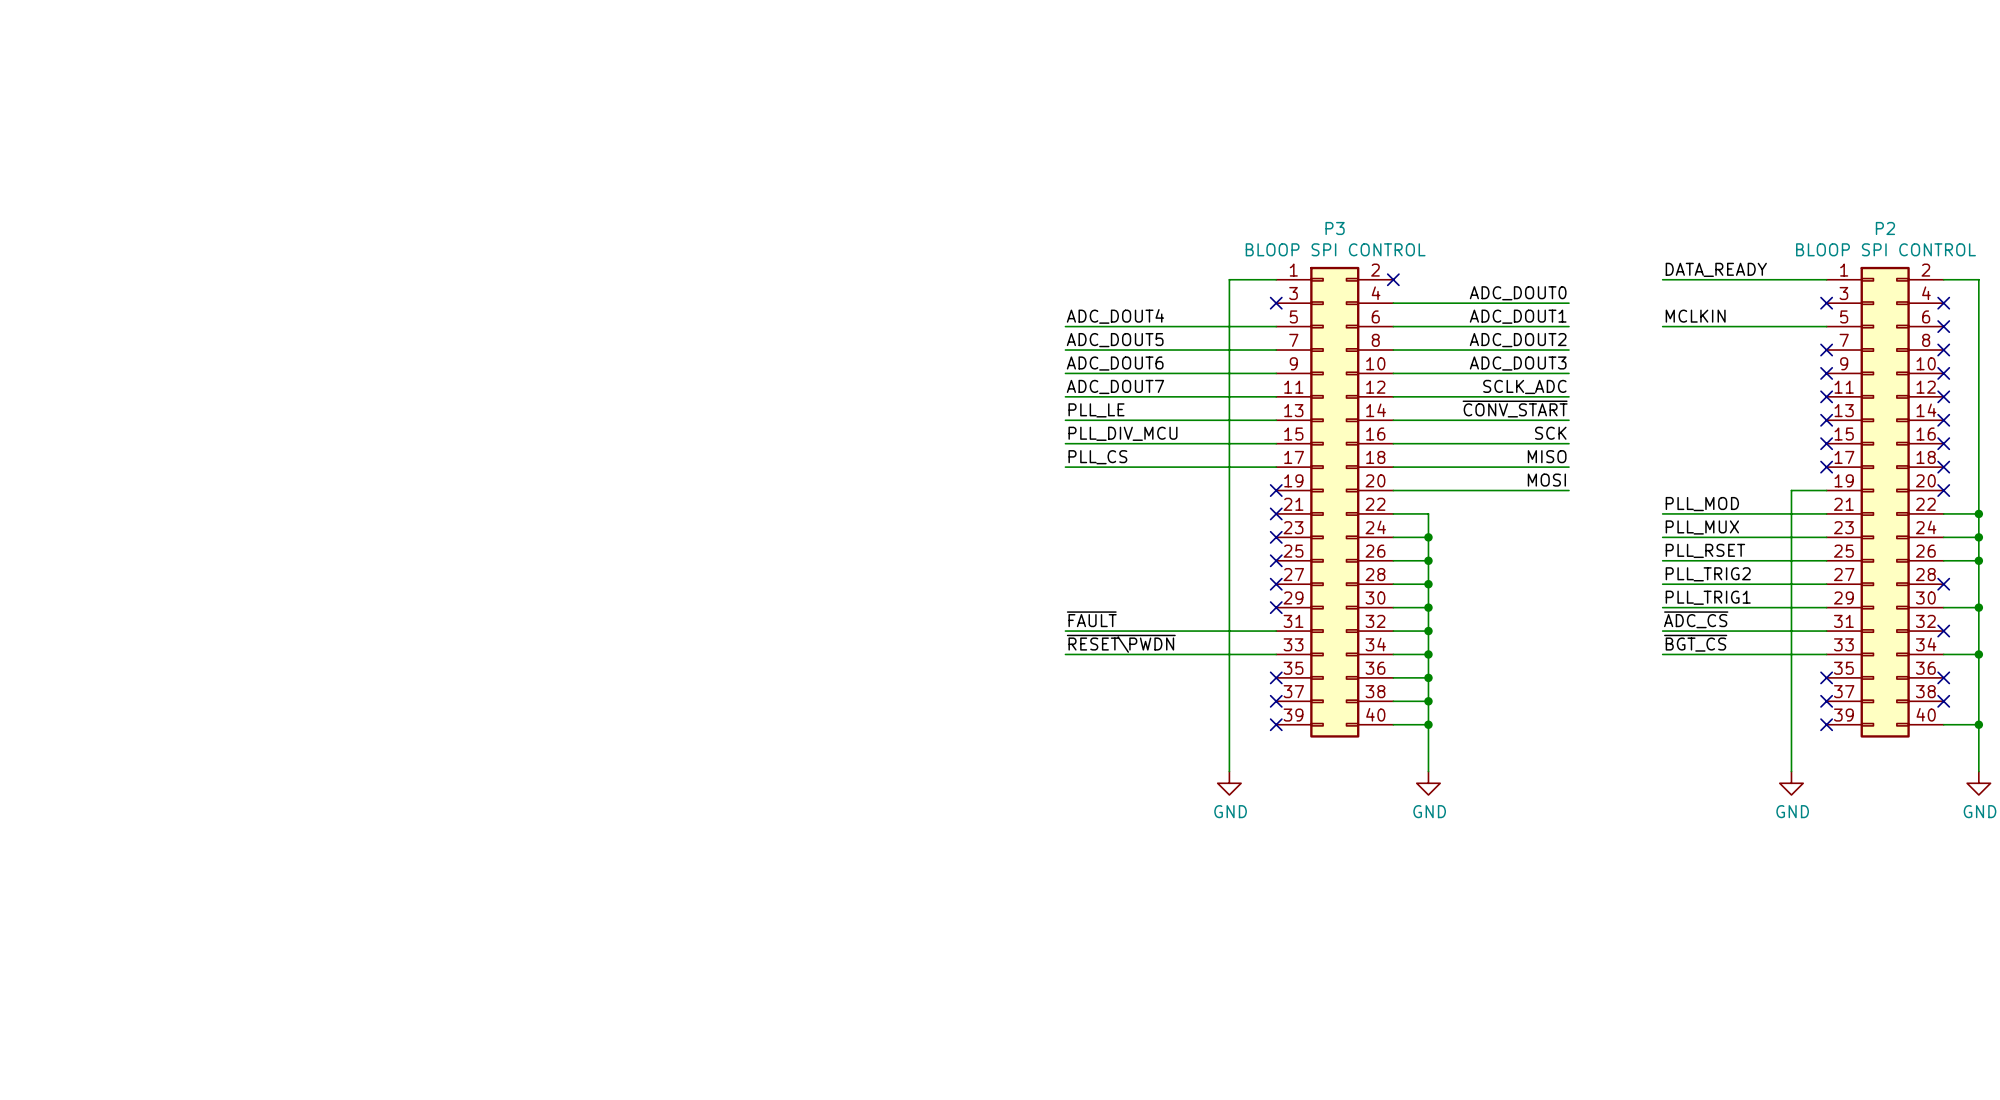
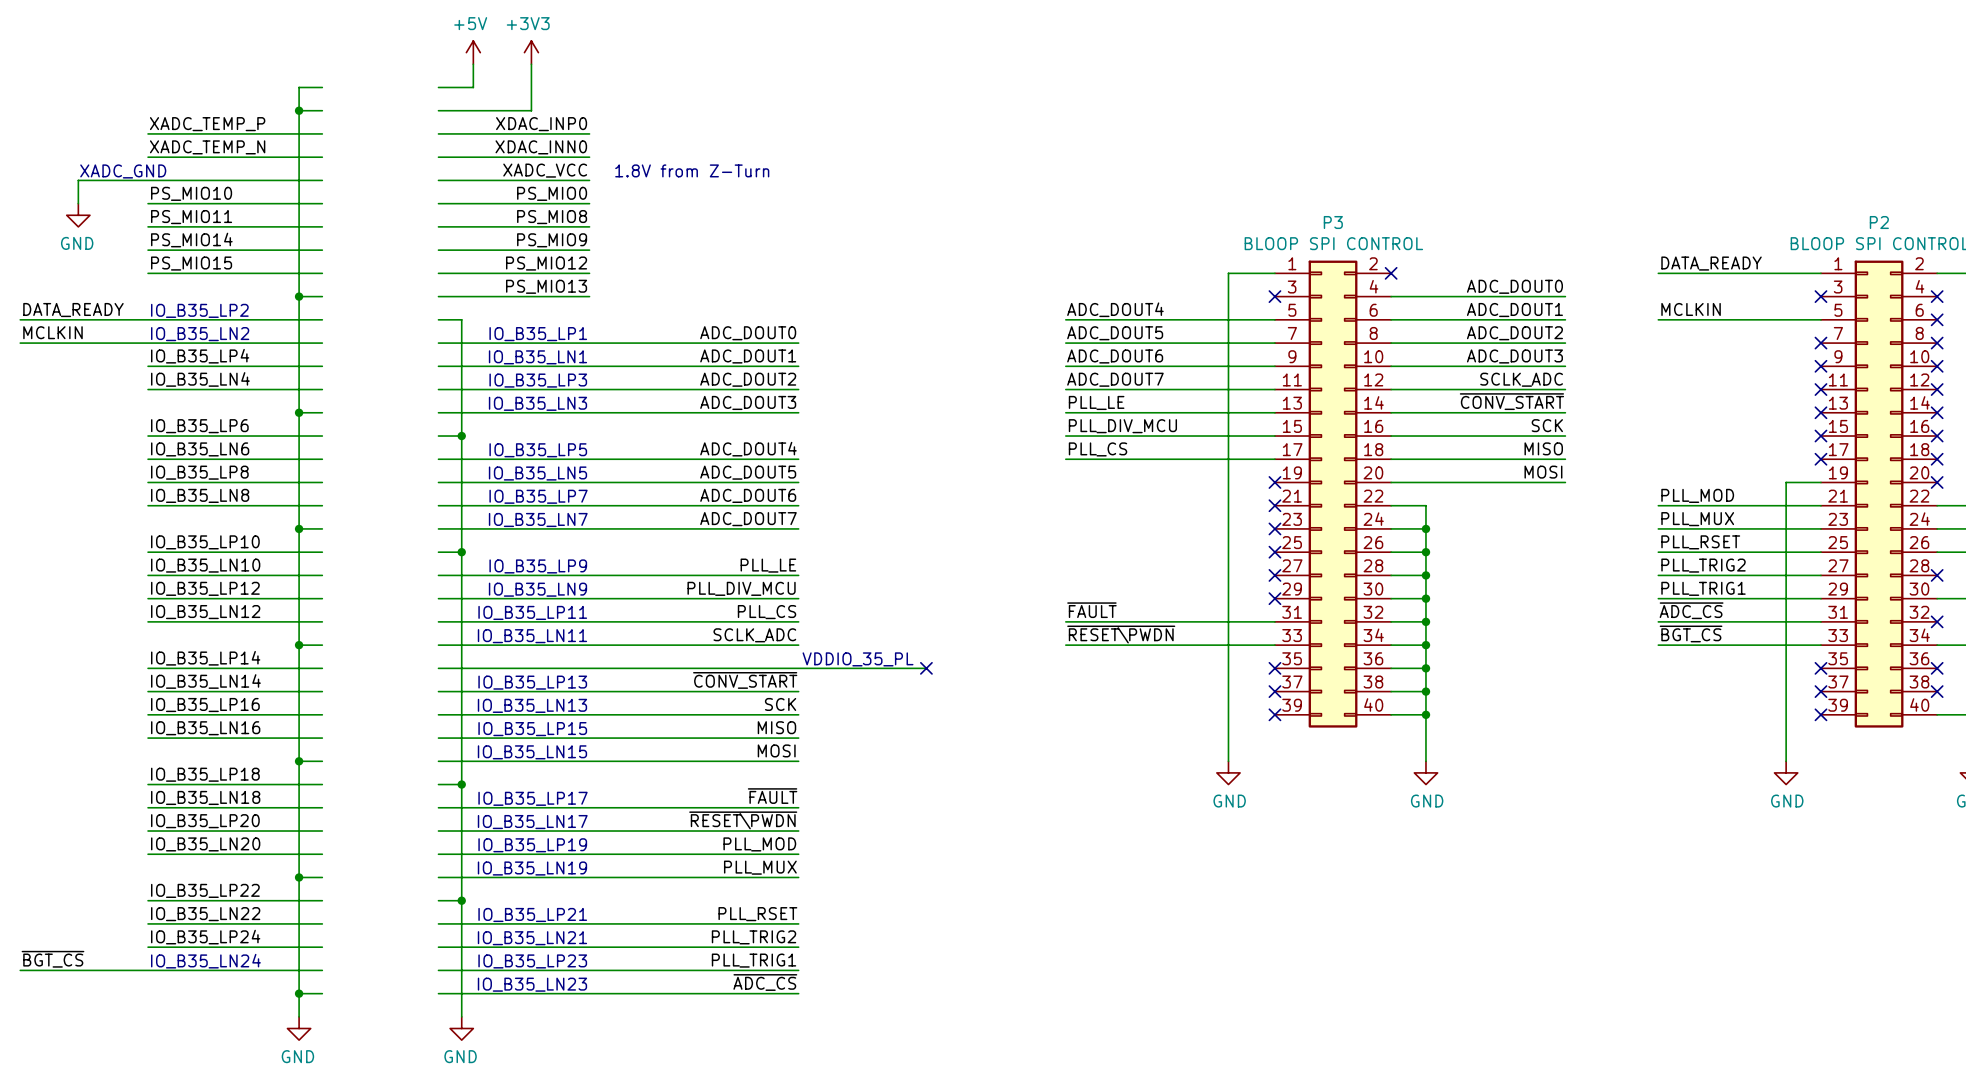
power symbol: none -> +5V (473, 52)
power symbol: none -> +3V3 (531, 52)
wire: none -> (473, 64) (473, 87) (438, 87)
wire: none -> (531, 64) (531, 110) (438, 110)
wire: none -> (322, 87) (299, 87) (299, 1016)
wire: none -> (299, 110) (322, 110)
junction: none -> (299, 110)
label: none -> XADC_TEMP_P (207, 124)
label: none -> XDAC_INP0 (541, 124)
wire: none -> (148, 133) (322, 133)
wire: none -> (438, 133) (589, 133)
label: none -> XADC_TEMP_N (207, 147)
label: none -> XDAC_INN0 (541, 147)
wire: none -> (148, 157) (322, 157)
wire: none -> (438, 157) (589, 157)
label: none -> XADC_VCC (545, 170)
text: none -> 1.8V from Z-Turn (692, 170)
text: none -> XADC_GND (123, 171)
wire: none -> (322, 180) (78, 180) (78, 203)
wire: none -> (438, 180) (589, 180)
label: none -> PS_MIO10 (191, 193)
label: none -> PS_MIO0 (552, 193)
wire: none -> (148, 203) (322, 203)
wire: none -> (438, 203) (589, 203)
power symbol: none -> GND (78, 215)
label: none -> PS_MIO11 (191, 217)
label: none -> PS_MIO8 (552, 217)
wire: none -> (148, 226) (322, 226)
wire: none -> (438, 226) (589, 226)
label: none -> PS_MIO14 (191, 240)
label: none -> PS_MIO9 (552, 240)
wire: none -> (148, 250) (322, 250)
wire: none -> (438, 250) (589, 250)
label: none -> PS_MIO15 (191, 263)
label: none -> PS_MIO12 (546, 263)
wire: none -> (148, 273) (322, 273)
wire: none -> (438, 273) (589, 273)
label: none -> PS_MIO13 (546, 286)
wire: none -> (299, 296) (322, 296)
junction: none -> (299, 296)
wire: none -> (438, 296) (589, 296)
label: none -> DATA_READY (73, 310)
text: none -> IO_B35_LP2 (199, 310)
wire: none -> (20, 319) (322, 319)
wire: none -> (438, 319) (461, 319) (461, 1016)
label: none -> MCLKIN (52, 332)
text: none -> IO_B35_LN2 (200, 334)
text: none -> IO_B35_LP1 (538, 334)
label: none -> ADC_DOUT0 (748, 333)
wire: none -> (20, 343) (322, 343)
wire: none -> (438, 343) (798, 343)
label: none -> IO_B35_LP4 (200, 356)
label: none -> ADC_DOUT1 (748, 356)
text: none -> IO_B35_LN1 (537, 357)
wire: none -> (148, 366) (322, 366)
wire: none -> (438, 366) (798, 366)
label: none -> IO_B35_LN4 (200, 379)
label: none -> ADC_DOUT2 (748, 379)
text: none -> IO_B35_LP3 (538, 380)
wire: none -> (148, 389) (322, 389)
wire: none -> (438, 389) (798, 389)
label: none -> ADC_DOUT3 (748, 402)
text: none -> IO_B35_LN3 (537, 403)
wire: none -> (299, 412) (322, 412)
junction: none -> (299, 412)
wire: none -> (438, 412) (798, 412)
label: none -> IO_B35_LP6 (199, 426)
wire: none -> (148, 436) (322, 436)
wire: none -> (438, 436) (461, 436)
junction: none -> (461, 436)
label: none -> ADC_DOUT4 (748, 449)
label: none -> IO_B35_LN6 (200, 449)
text: none -> IO_B35_LP5 (538, 450)
wire: none -> (148, 459) (322, 459)
wire: none -> (438, 459) (798, 459)
label: none -> IO_B35_LP8 (199, 472)
label: none -> ADC_DOUT5 (748, 472)
text: none -> IO_B35_LN5 (537, 473)
wire: none -> (148, 482) (322, 482)
wire: none -> (438, 482) (798, 482)
label: none -> IO_B35_LN8 (200, 495)
text: none -> IO_B35_LP7 (538, 496)
label: none -> ADC_DOUT6 (748, 495)
wire: none -> (148, 505) (322, 505)
wire: none -> (438, 505) (798, 505)
label: none -> ADC_DOUT7 (748, 519)
text: none -> IO_B35_LN7 (538, 519)
wire: none -> (299, 528) (322, 528)
junction: none -> (299, 528)
wire: none -> (438, 528) (798, 528)
label: none -> IO_B35_LP10 (205, 542)
wire: none -> (148, 552) (322, 552)
wire: none -> (438, 552) (461, 552)
junction: none -> (461, 552)
label: none -> IO_B35_LN10 (205, 565)
label: none -> PLL_LE (768, 565)
text: none -> IO_B35_LP9 (538, 566)
wire: none -> (148, 575) (322, 575)
wire: none -> (438, 575) (798, 575)
label: none -> IO_B35_LP12 (205, 588)
label: none -> PLL_DIV_MCU (741, 588)
text: none -> IO_B35_LN9 (537, 589)
wire: none -> (148, 598) (322, 598)
wire: none -> (438, 598) (798, 598)
label: none -> IO_B35_LN12 (205, 612)
label: none -> PLL_CS (767, 612)
text: none -> IO_B35_LP11 (532, 612)
wire: none -> (148, 621) (322, 621)
wire: none -> (438, 621) (798, 621)
label: none -> SCLK_ADC (754, 635)
text: none -> IO_B35_LN11 (532, 636)
wire: none -> (299, 645) (322, 645)
junction: none -> (299, 645)
wire: none -> (438, 645) (798, 645)
label: none -> IO_B35_LP14 (205, 658)
text: none -> VDDIO_35_PL (858, 659)
wire: none -> (148, 668) (322, 668)
wire: none -> (438, 668) (926, 668)
no-connect mark: none -> (926, 668)
label: none -> ~{CONV_START} (745, 680)
label: none -> IO_B35_LN14 (205, 681)
text: none -> IO_B35_LP13 (532, 682)
wire: none -> (148, 691) (322, 691)
wire: none -> (438, 691) (798, 691)
label: none -> IO_B35_LP16 (205, 705)
label: none -> SCK (780, 704)
text: none -> IO_B35_LN13 (532, 705)
wire: none -> (148, 714) (322, 714)
wire: none -> (438, 714) (798, 714)
label: none -> MISO (776, 727)
label: none -> IO_B35_LN16 (205, 728)
text: none -> IO_B35_LP15 (532, 729)
wire: none -> (148, 738) (322, 738)
wire: none -> (438, 738) (798, 738)
label: none -> MOSI (776, 750)
text: none -> IO_B35_LN15 (532, 752)
wire: none -> (299, 761) (322, 761)
junction: none -> (299, 761)
wire: none -> (438, 761) (798, 761)
label: none -> IO_B35_LP18 (205, 774)
wire: none -> (148, 784) (322, 784)
wire: none -> (438, 784) (461, 784)
junction: none -> (461, 784)
label: none -> ~{FAULT} (772, 796)
label: none -> IO_B35_LN18 (205, 797)
text: none -> IO_B35_LP17 (533, 798)
wire: none -> (148, 807) (322, 807)
wire: none -> (438, 807) (798, 807)
label: none -> IO_B35_LP20 (205, 821)
label: none -> ~{RESET\PWDN} (743, 820)
text: none -> IO_B35_LN17 (532, 822)
wire: none -> (148, 831) (322, 831)
wire: none -> (438, 831) (798, 831)
label: none -> IO_B35_LN20 (205, 844)
label: none -> PLL_MOD (759, 844)
text: none -> IO_B35_LP19 (532, 845)
wire: none -> (148, 854) (322, 854)
wire: none -> (438, 854) (798, 854)
label: none -> PLL_MUX (760, 867)
text: none -> IO_B35_LN19 (532, 868)
wire: none -> (299, 877) (322, 877)
junction: none -> (299, 877)
wire: none -> (438, 877) (798, 877)
label: none -> IO_B35_LP22 (205, 890)
wire: none -> (148, 900) (322, 900)
wire: none -> (438, 900) (461, 900)
junction: none -> (461, 900)
label: none -> IO_B35_LN22 (205, 914)
label: none -> PLL_RSET (757, 914)
text: none -> IO_B35_LP21 (532, 914)
wire: none -> (148, 923) (322, 923)
wire: none -> (438, 923) (798, 923)
label: none -> IO_B35_LP24 (205, 937)
text: none -> IO_B35_LN21 (532, 938)
label: none -> PLL_TRIG2 (754, 937)
wire: none -> (148, 947) (322, 947)
wire: none -> (438, 947) (798, 947)
label: none -> ~{BGT_CS} (52, 959)
label: none -> PLL_TRIG1 (754, 960)
text: none -> IO_B35_LN24 (205, 961)
text: none -> IO_B35_LP23 (532, 961)
wire: none -> (20, 970) (322, 970)
wire: none -> (438, 970) (798, 970)
label: none -> ~{ADC_CS} (765, 982)
text: none -> IO_B35_LN23 (532, 984)
wire: none -> (299, 993) (322, 993)
junction: none -> (299, 993)
wire: none -> (438, 993) (798, 993)
power symbol: none -> GND (299, 1028)
power symbol: none -> GND (461, 1028)

